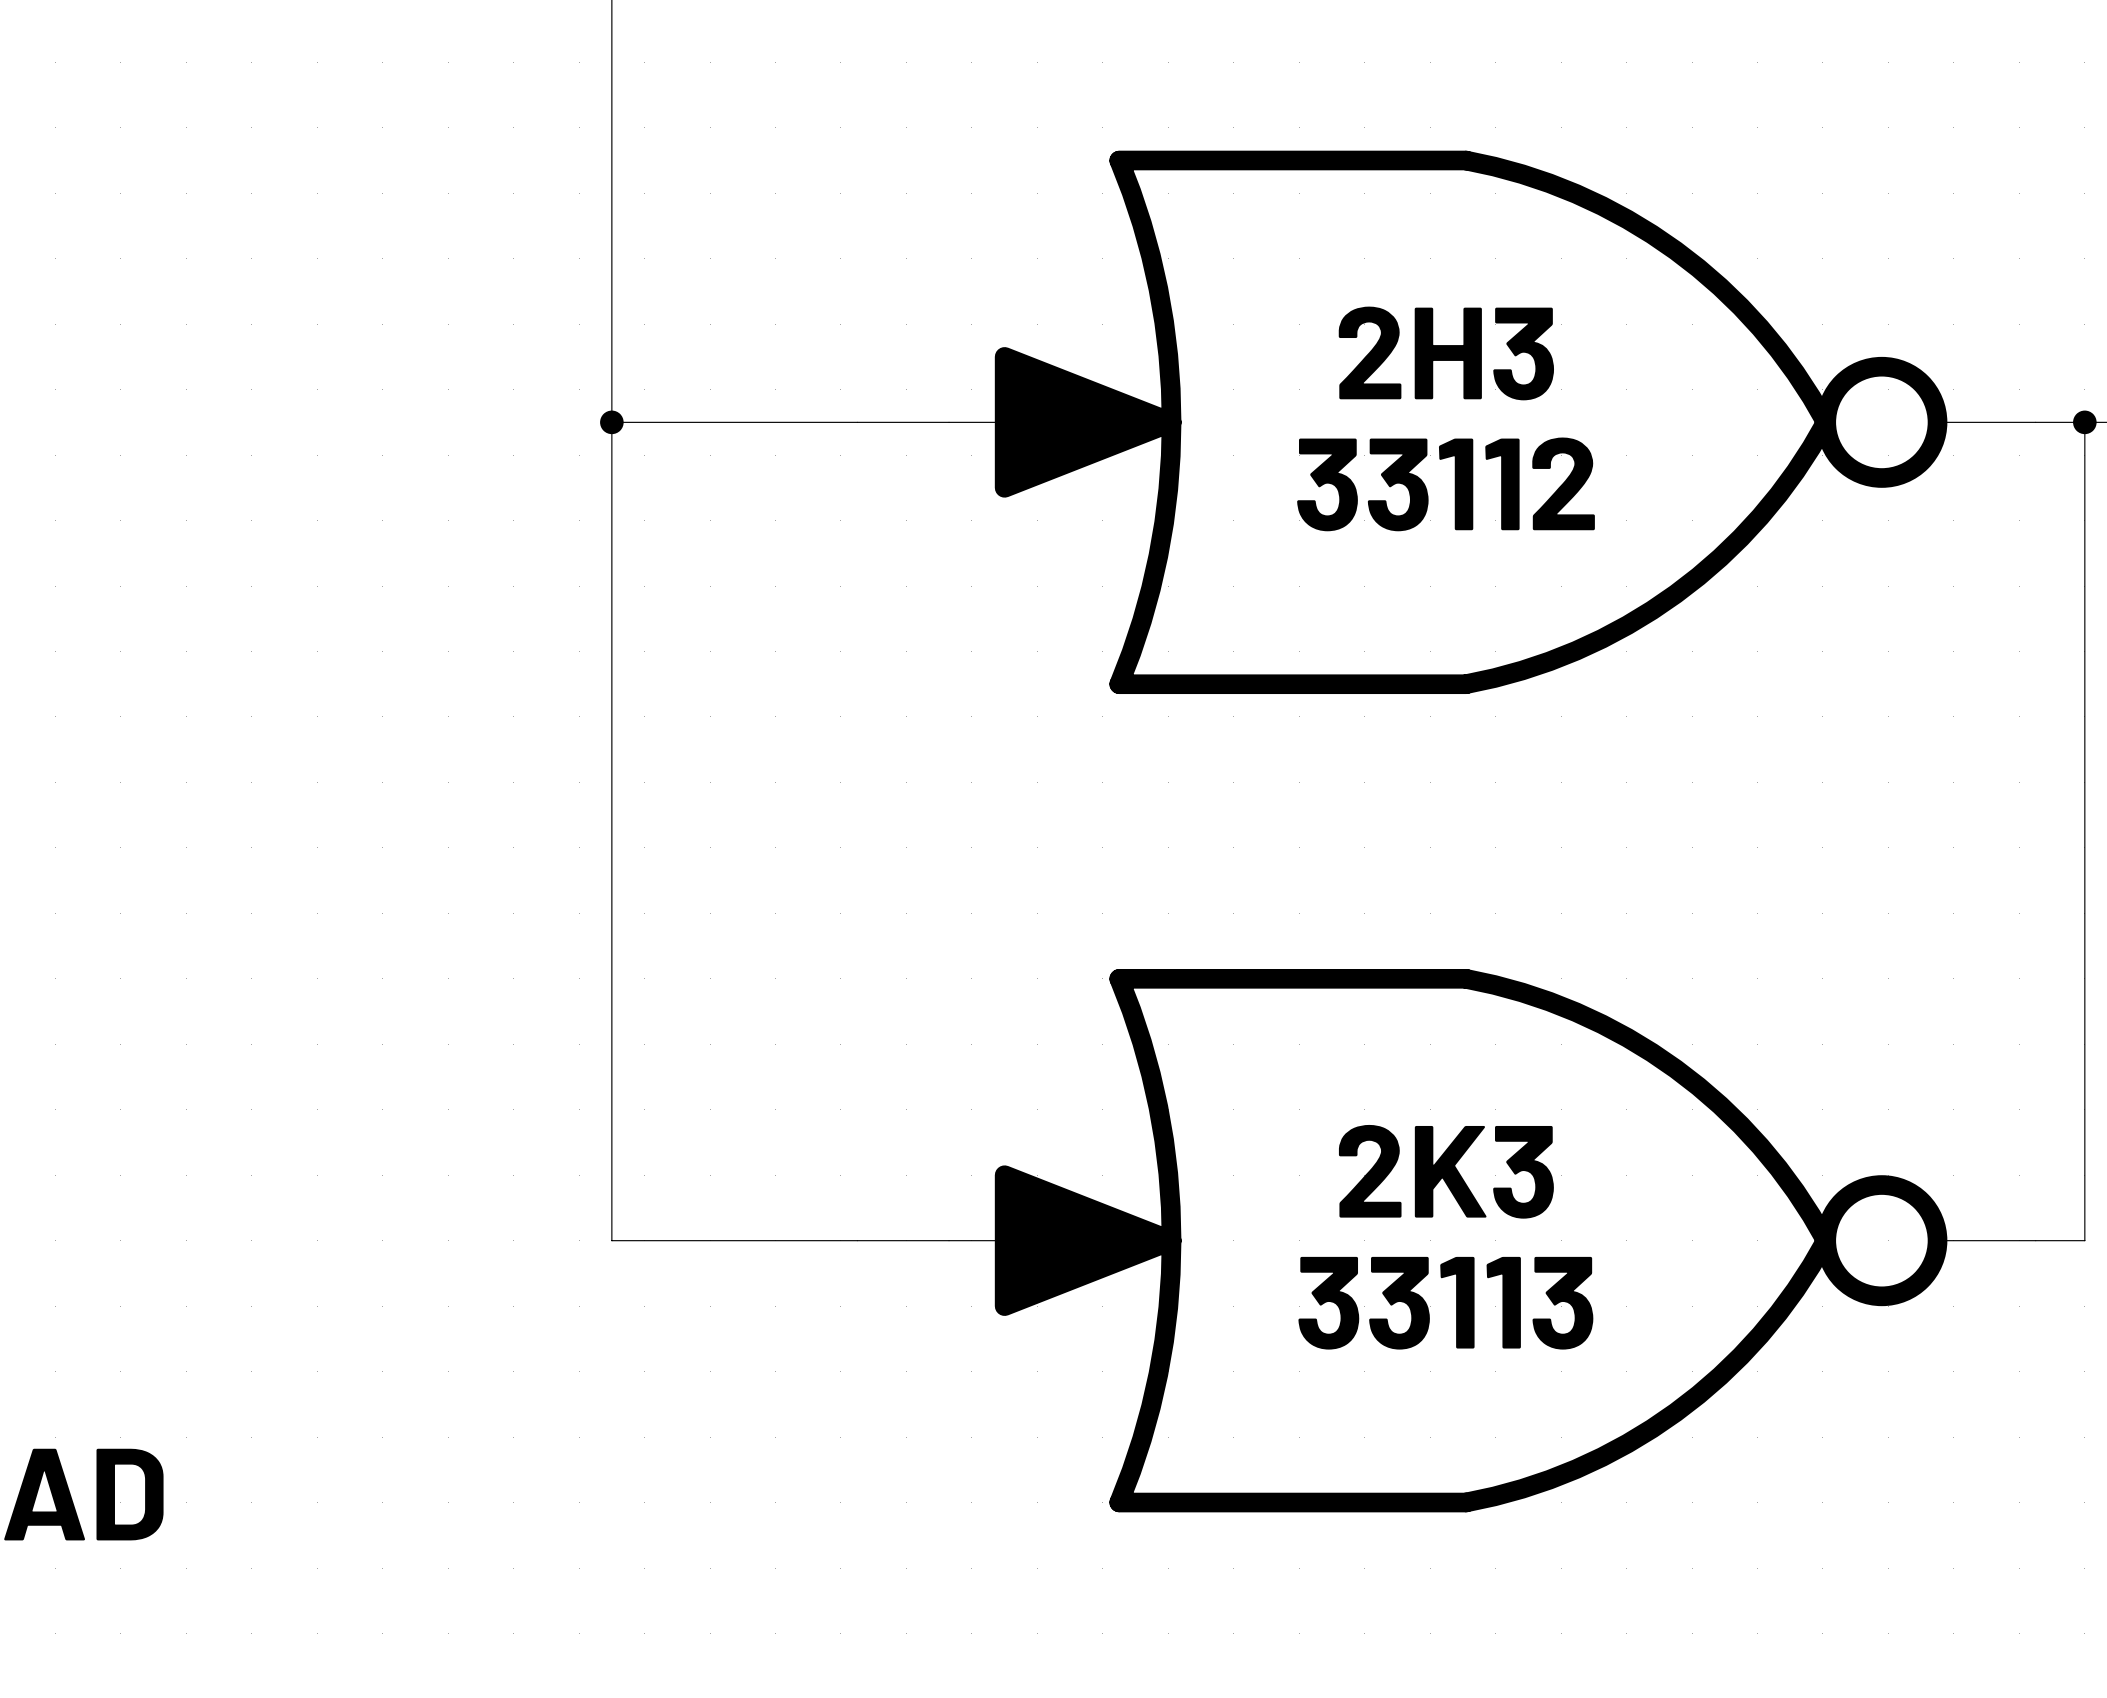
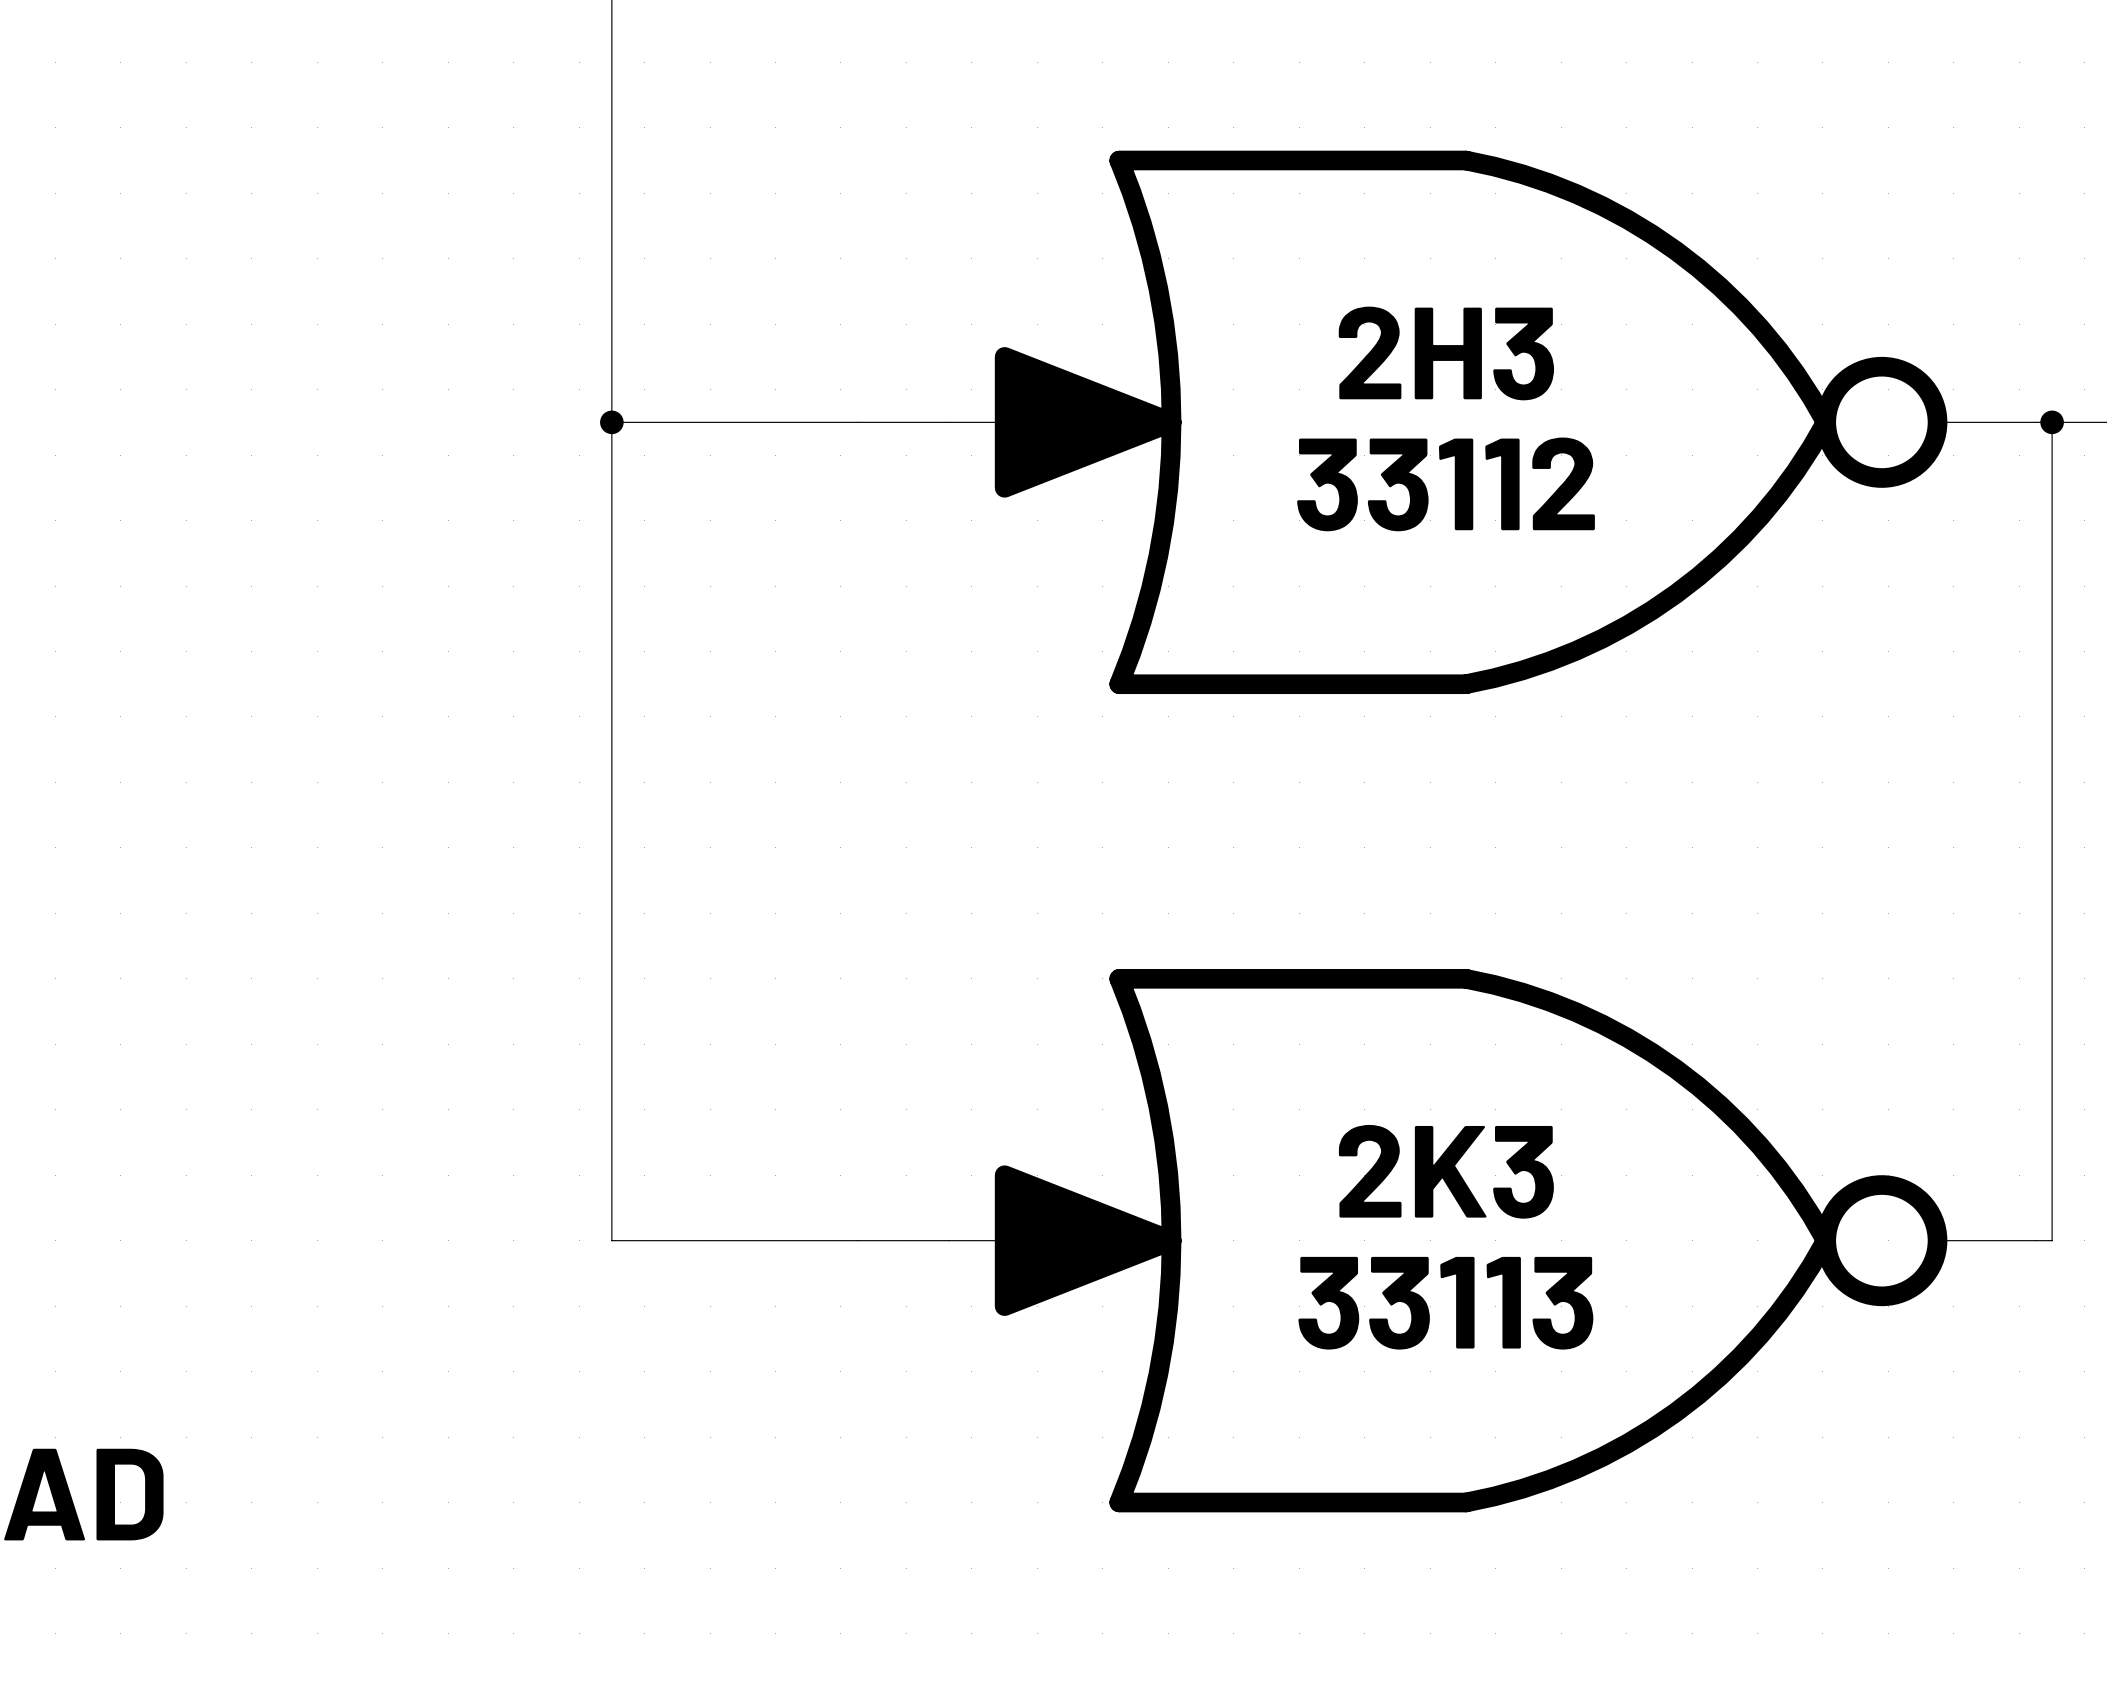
wire: (2084, 422) (2084, 1240) (2052, 1240) -> (2052, 422) (2052, 1240)
junction position: (2084, 422) -> (2052, 422)

